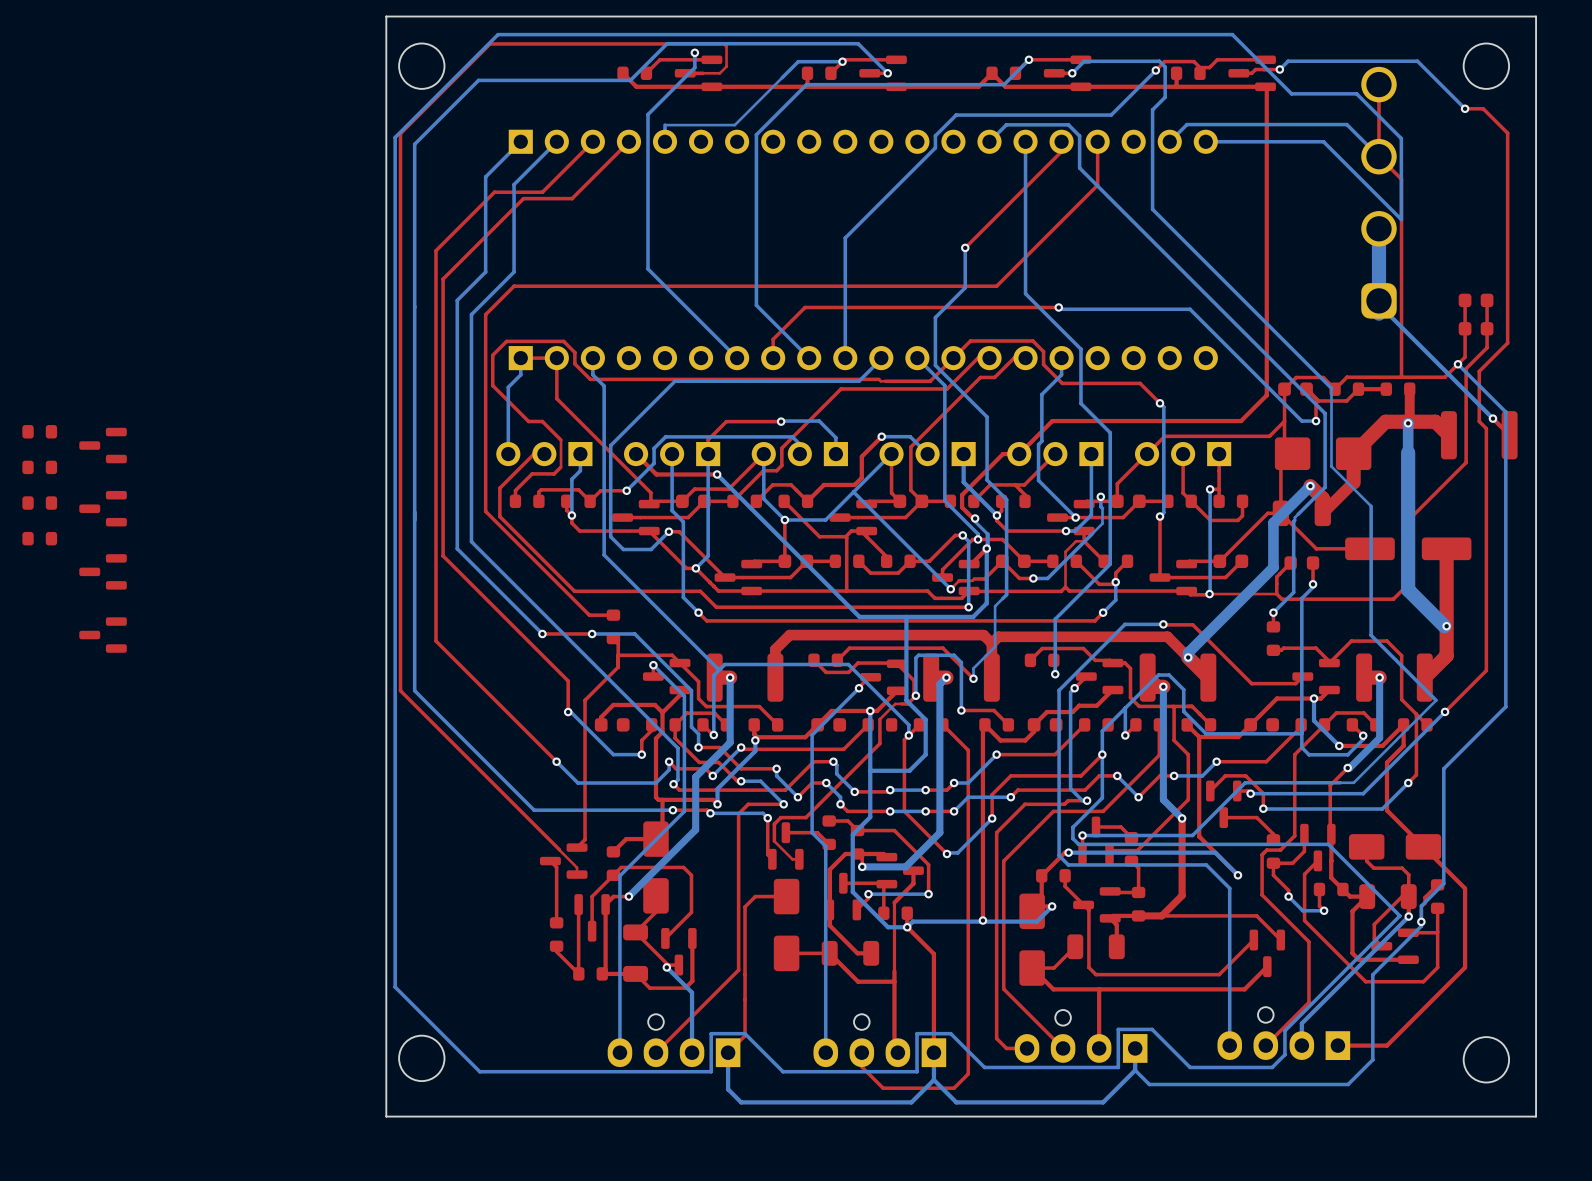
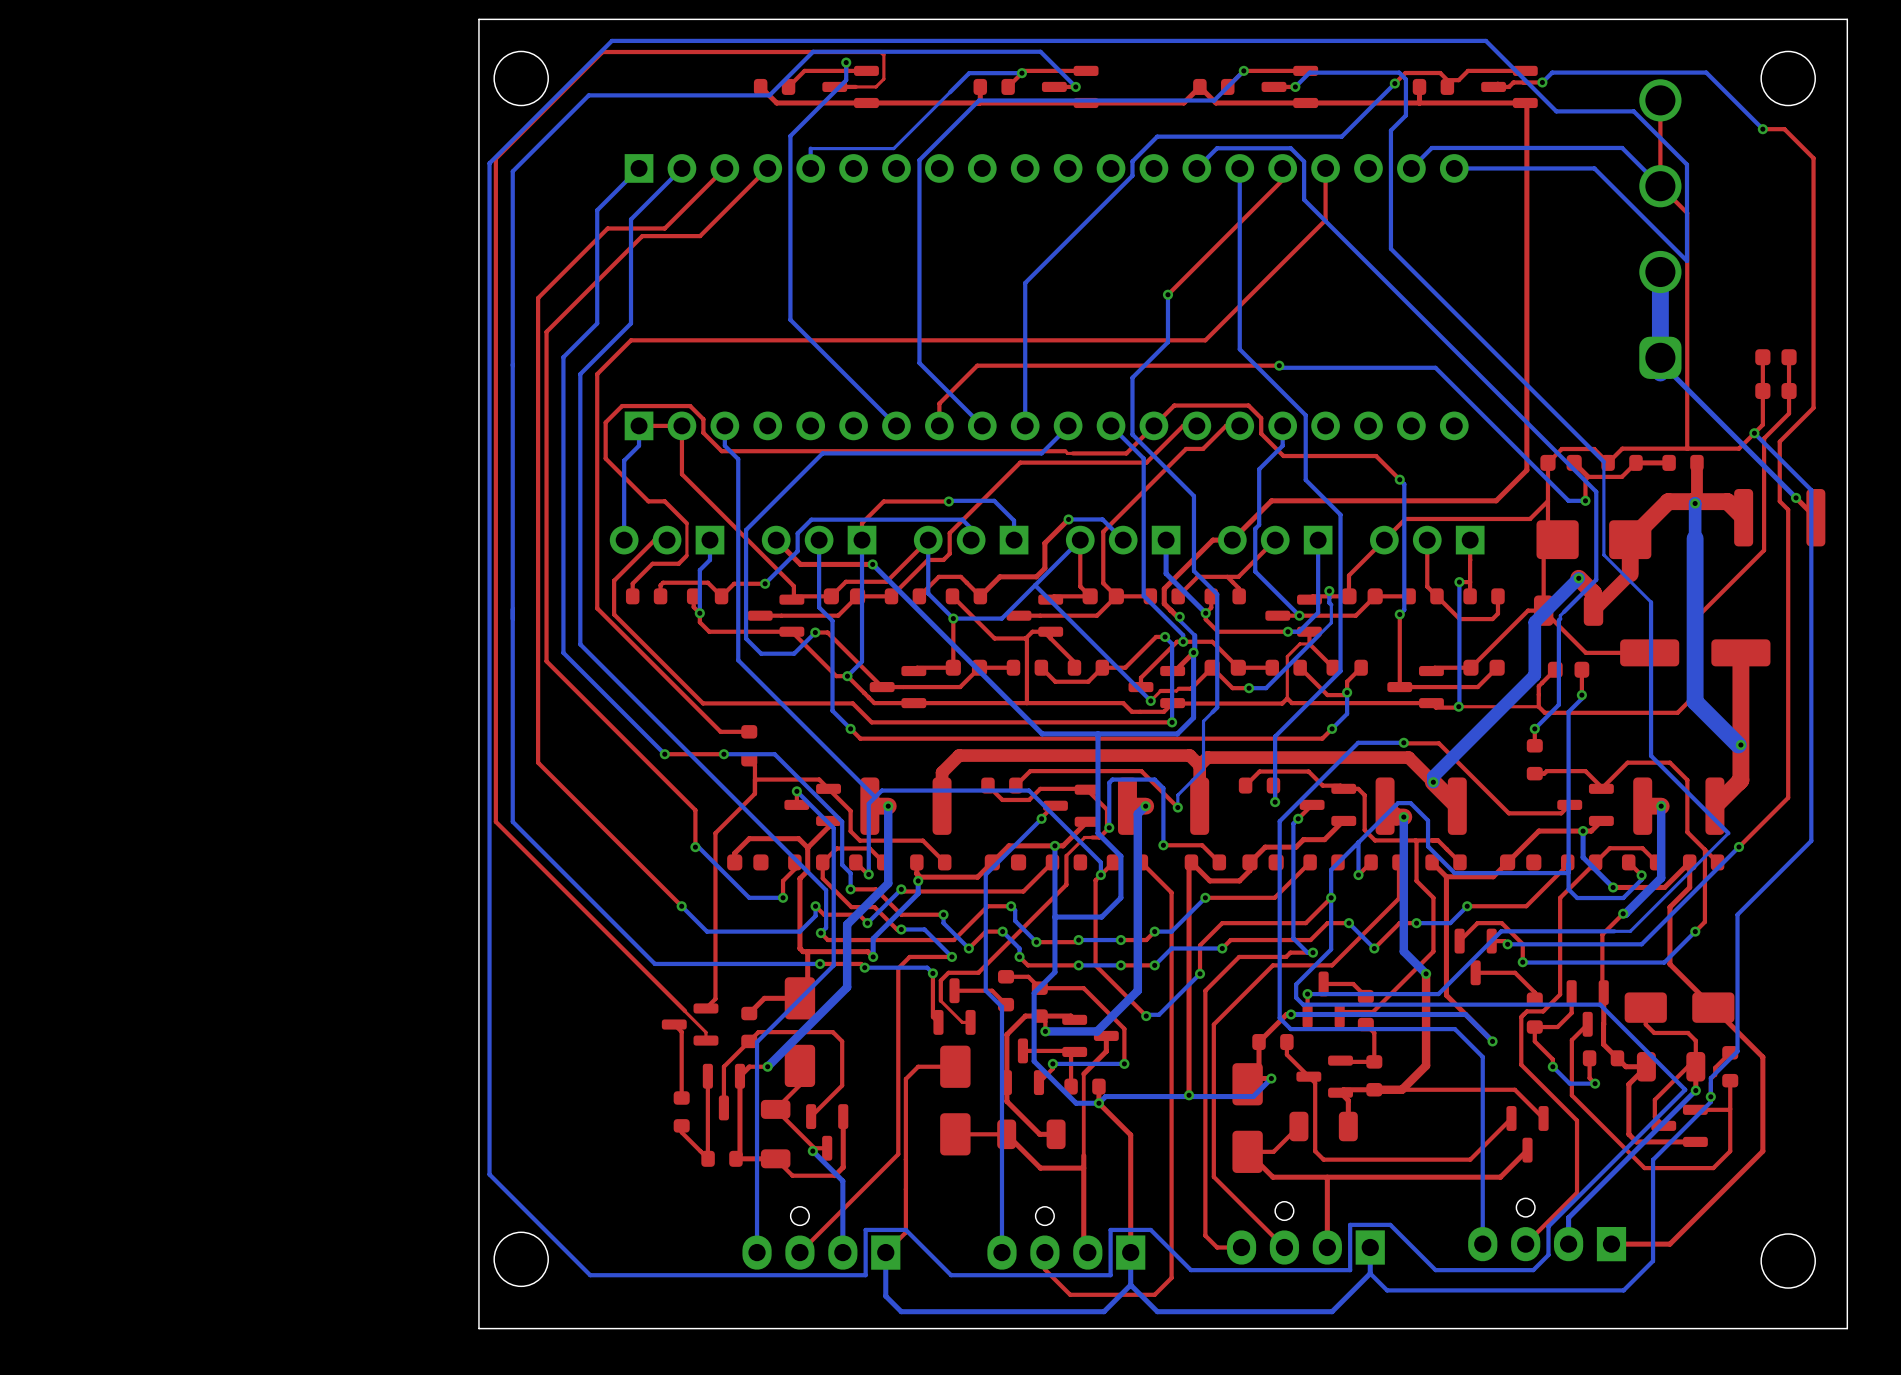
part: (39, 431) -> none
part: (103, 445) -> none
part: (39, 467) -> none
part: (39, 503) -> none
part: (103, 508) -> none
part: (39, 538) -> none
part: (103, 571) -> none
part: (103, 635) -> none

